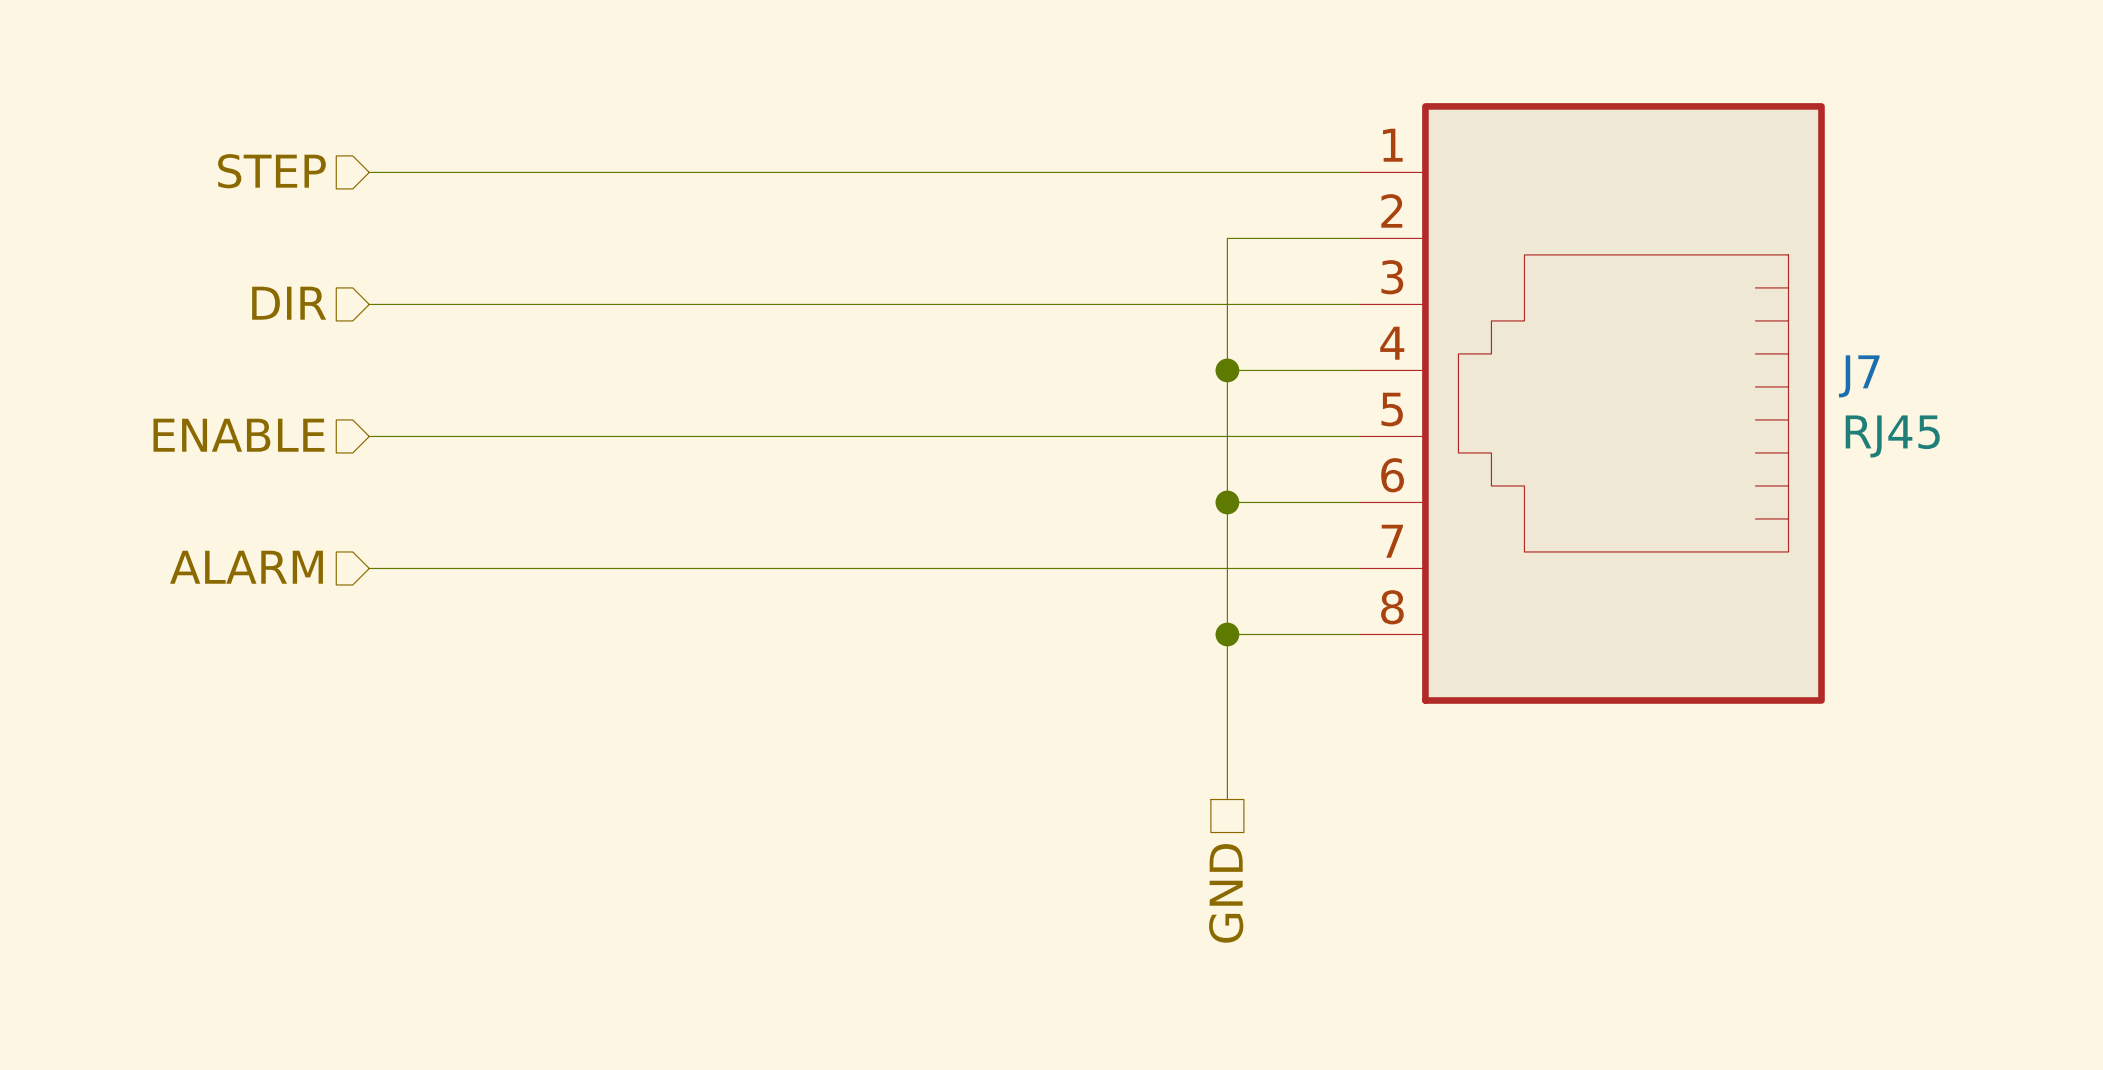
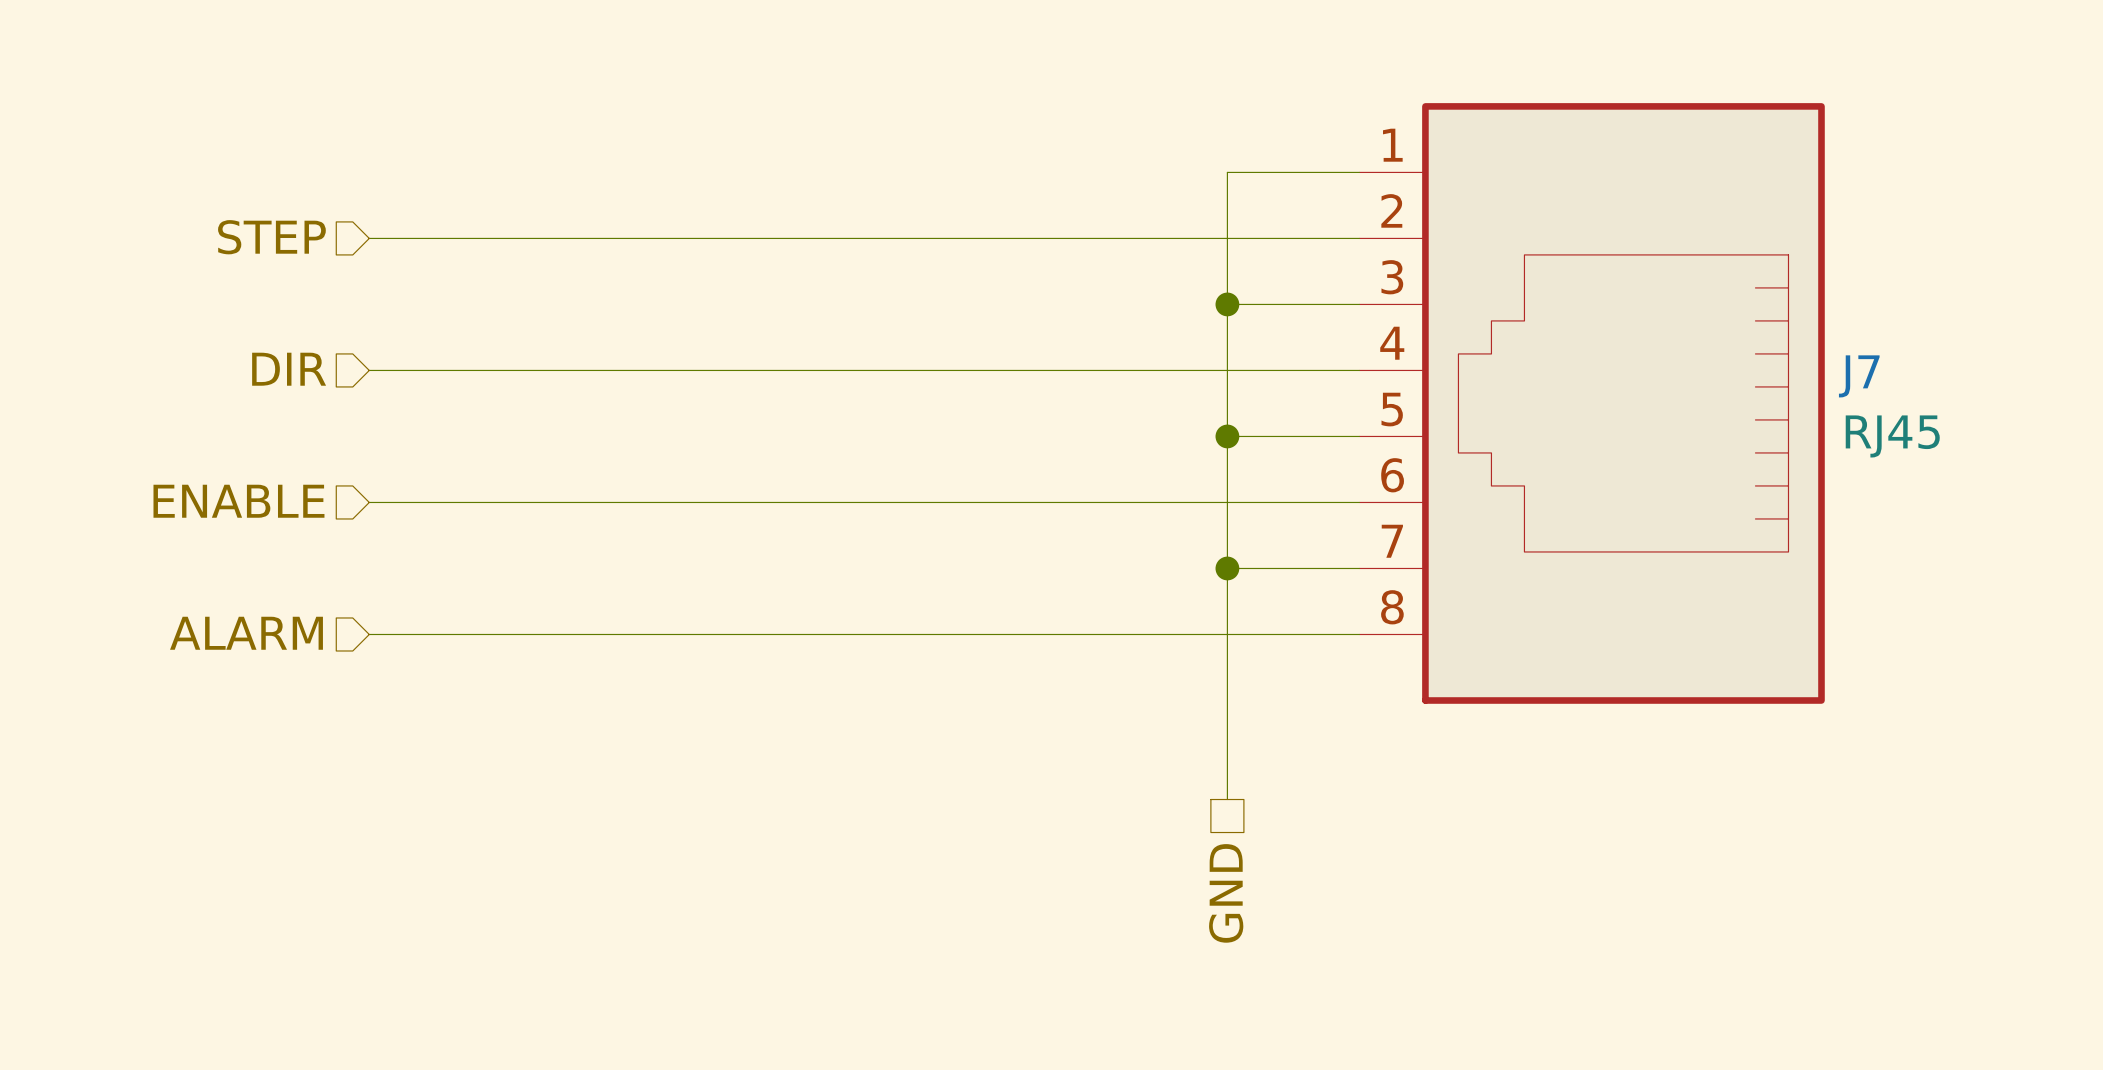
hierarchical label position: STEP (271, 171) -> STEP (271, 237)
wire: (369, 172) (1227, 172) -> (369, 238) (1227, 238) (1227, 172)
hierarchical label position: DIR (289, 303) -> DIR (289, 369)
wire: (369, 304) (1227, 304) -> (369, 370) (1227, 370)
junction: none -> (1227, 304)
junction: (1227, 370) -> none
hierarchical label position: ENABLE (238, 435) -> ENABLE (238, 501)
wire: (369, 436) (1227, 436) -> (369, 502) (1227, 502)
junction: none -> (1227, 436)
junction: (1227, 502) -> none
hierarchical label position: ALARM (246, 567) -> ALARM (246, 633)
wire: (369, 568) (1227, 568) -> (369, 634) (1227, 634)
junction: none -> (1227, 568)
junction: (1227, 634) -> none

